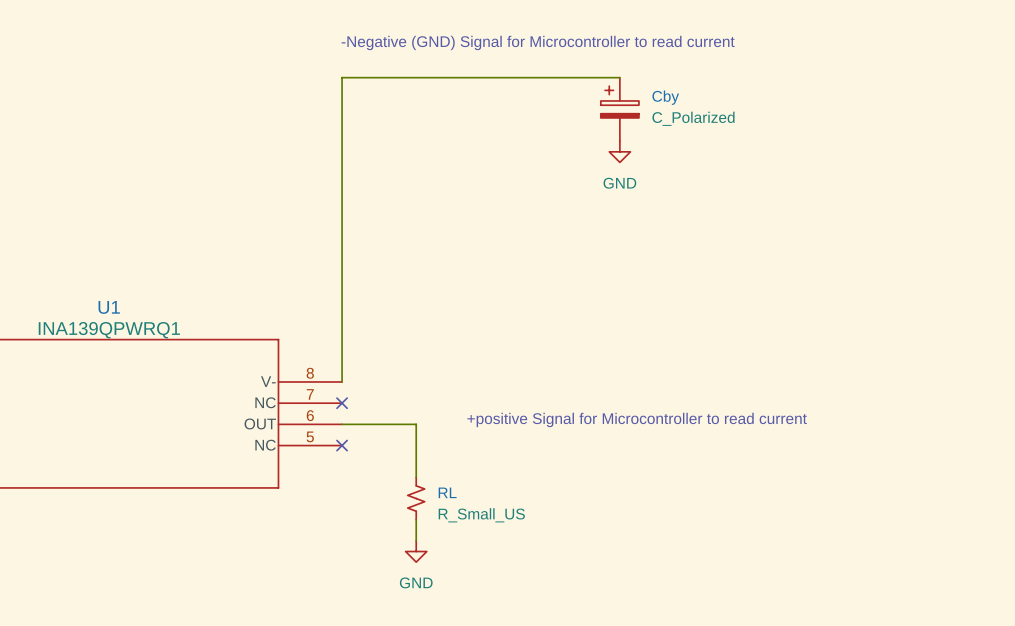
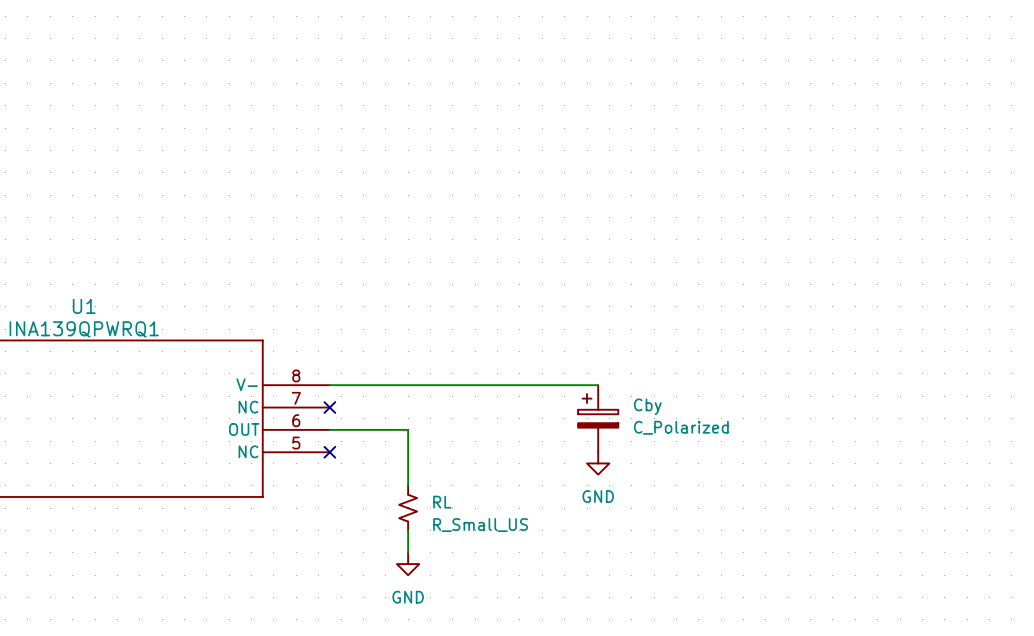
text: -Negative (GND) Signal for Microcontroller to read current (538, 42) -> none
wire: (619, 77) (342, 77) (342, 381) -> (598, 385) (329, 385)
Cby: C_Polarized (619, 109) -> none
power symbol: GND (619, 151) -> none
Cby: none -> C_Polarized (598, 418)
text: +positive Signal for Microcontroller to read current (637, 419) -> none
power symbol: none -> GND (598, 463)

